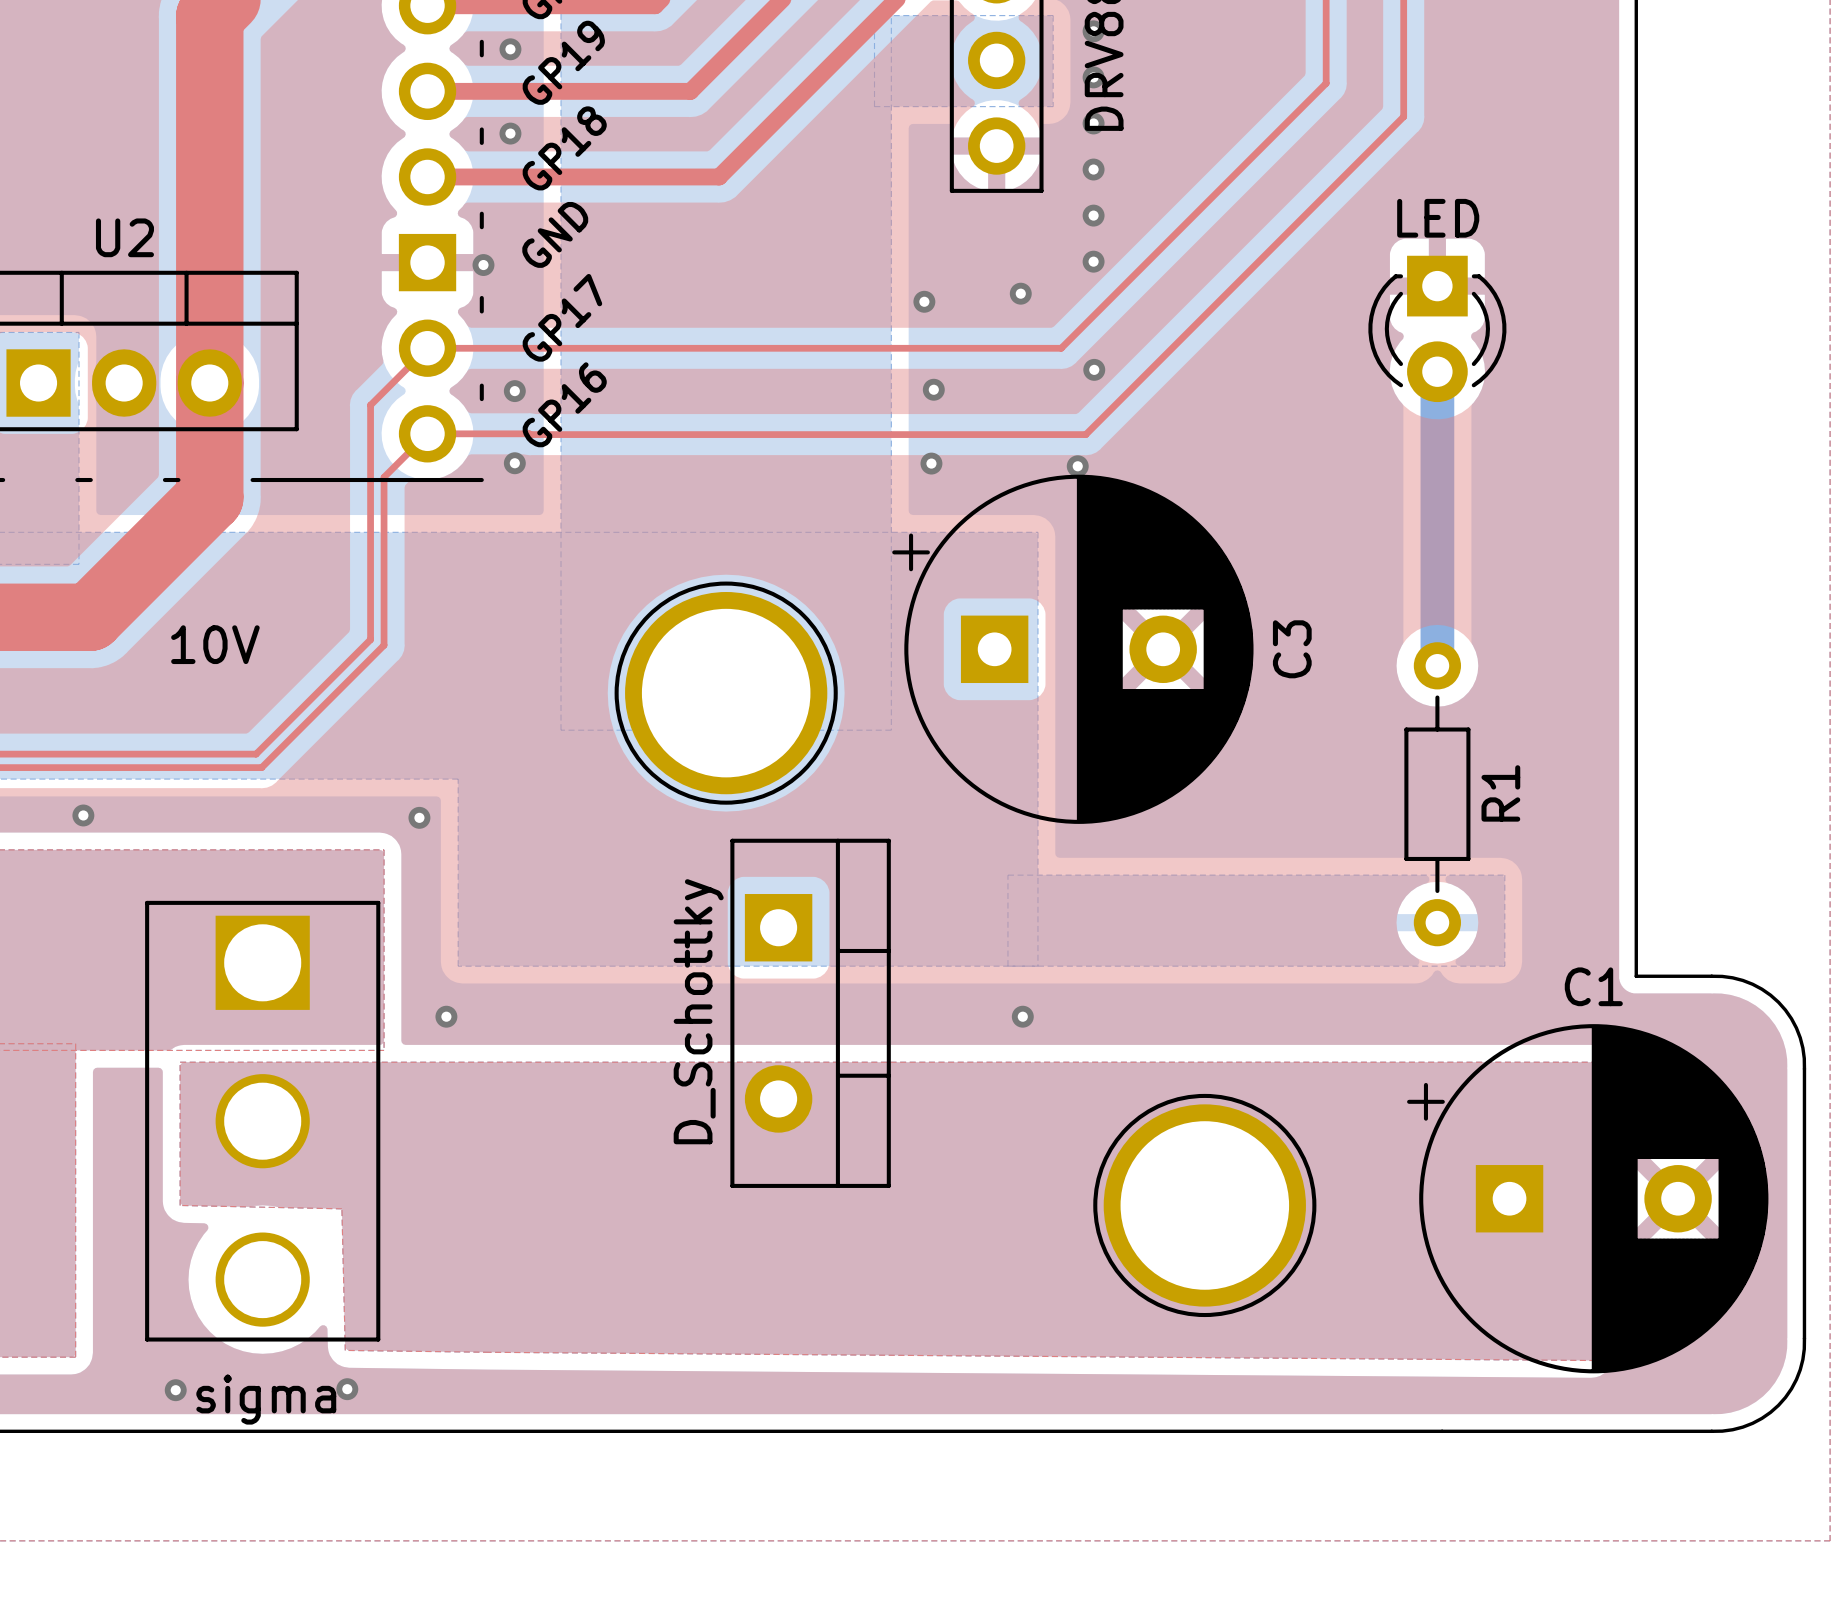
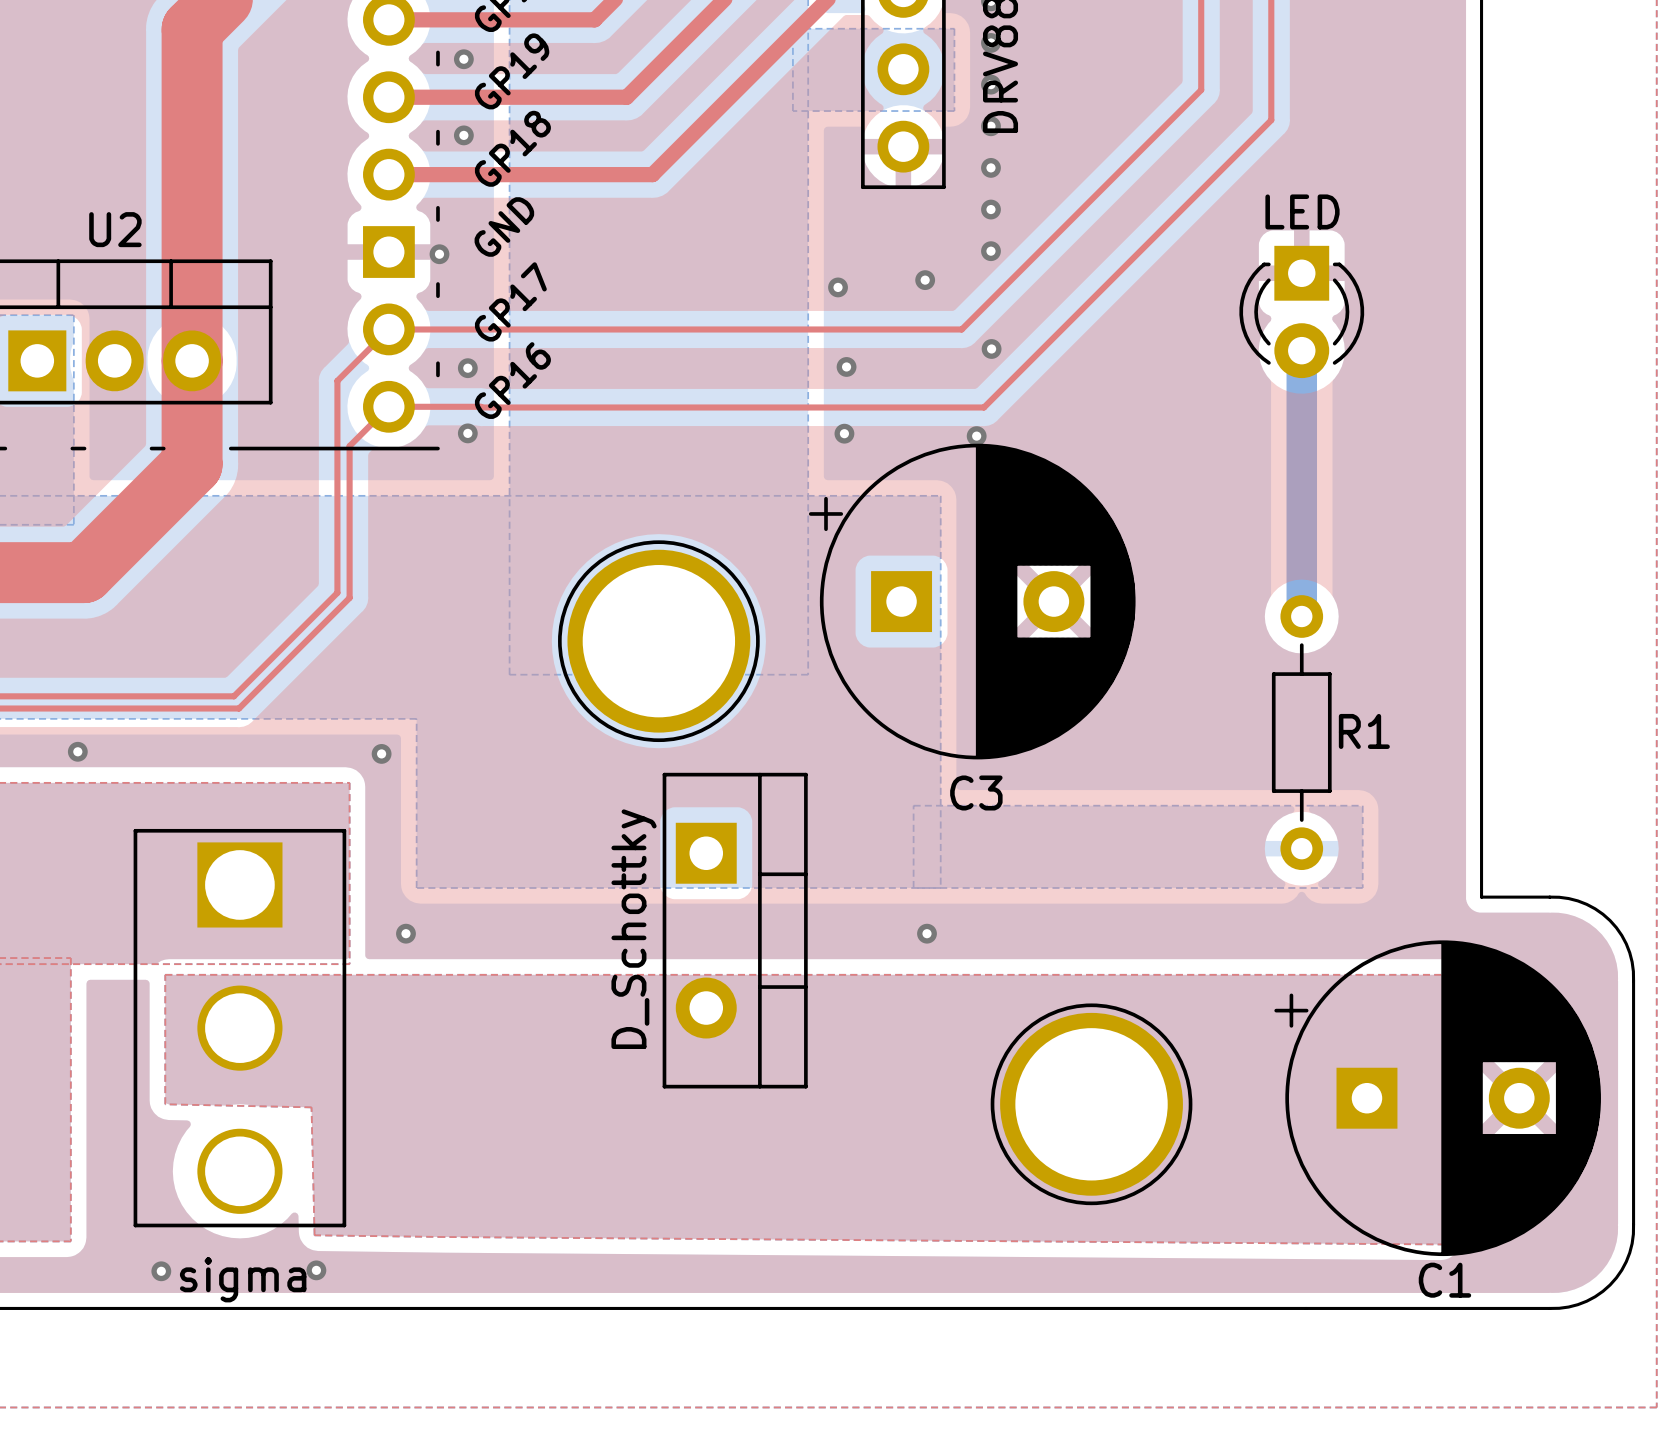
part value: 10V (215, 644) -> none
C3 name rotation: 0° (1292, 649) -> 90° clockwise (976, 793)
C3 name position: C3 (1292, 649) -> C3 (976, 793)
R1 name rotation: 0° (1500, 793) -> 90° clockwise (1364, 731)
C1 name position: C1 (1593, 986) -> C1 (1444, 1280)

